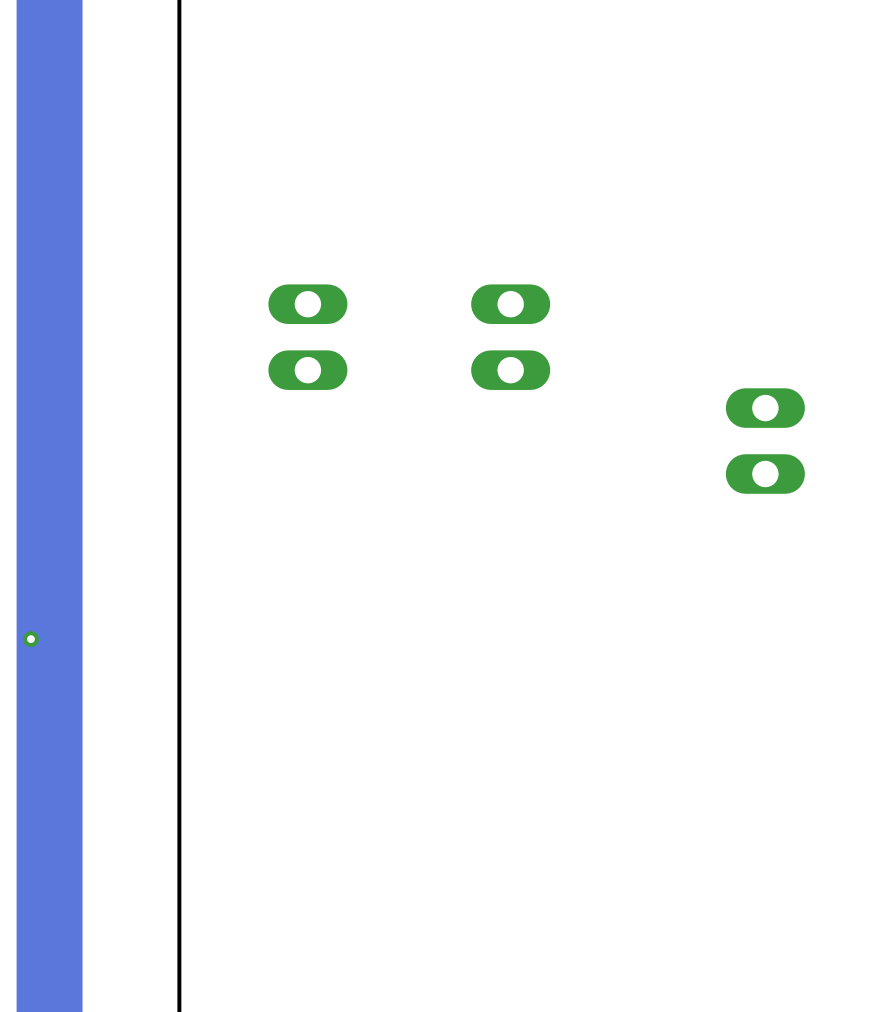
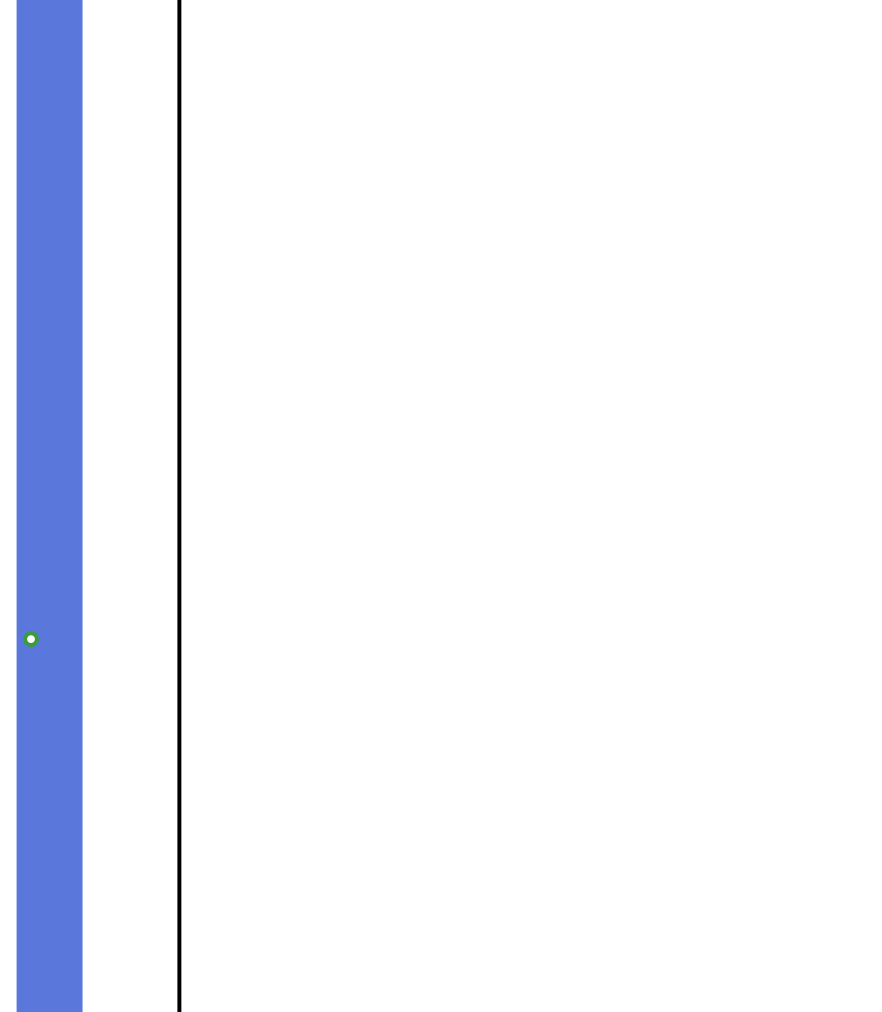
part: (307, 337) -> none
part: (510, 337) -> none
part: (765, 441) -> none

